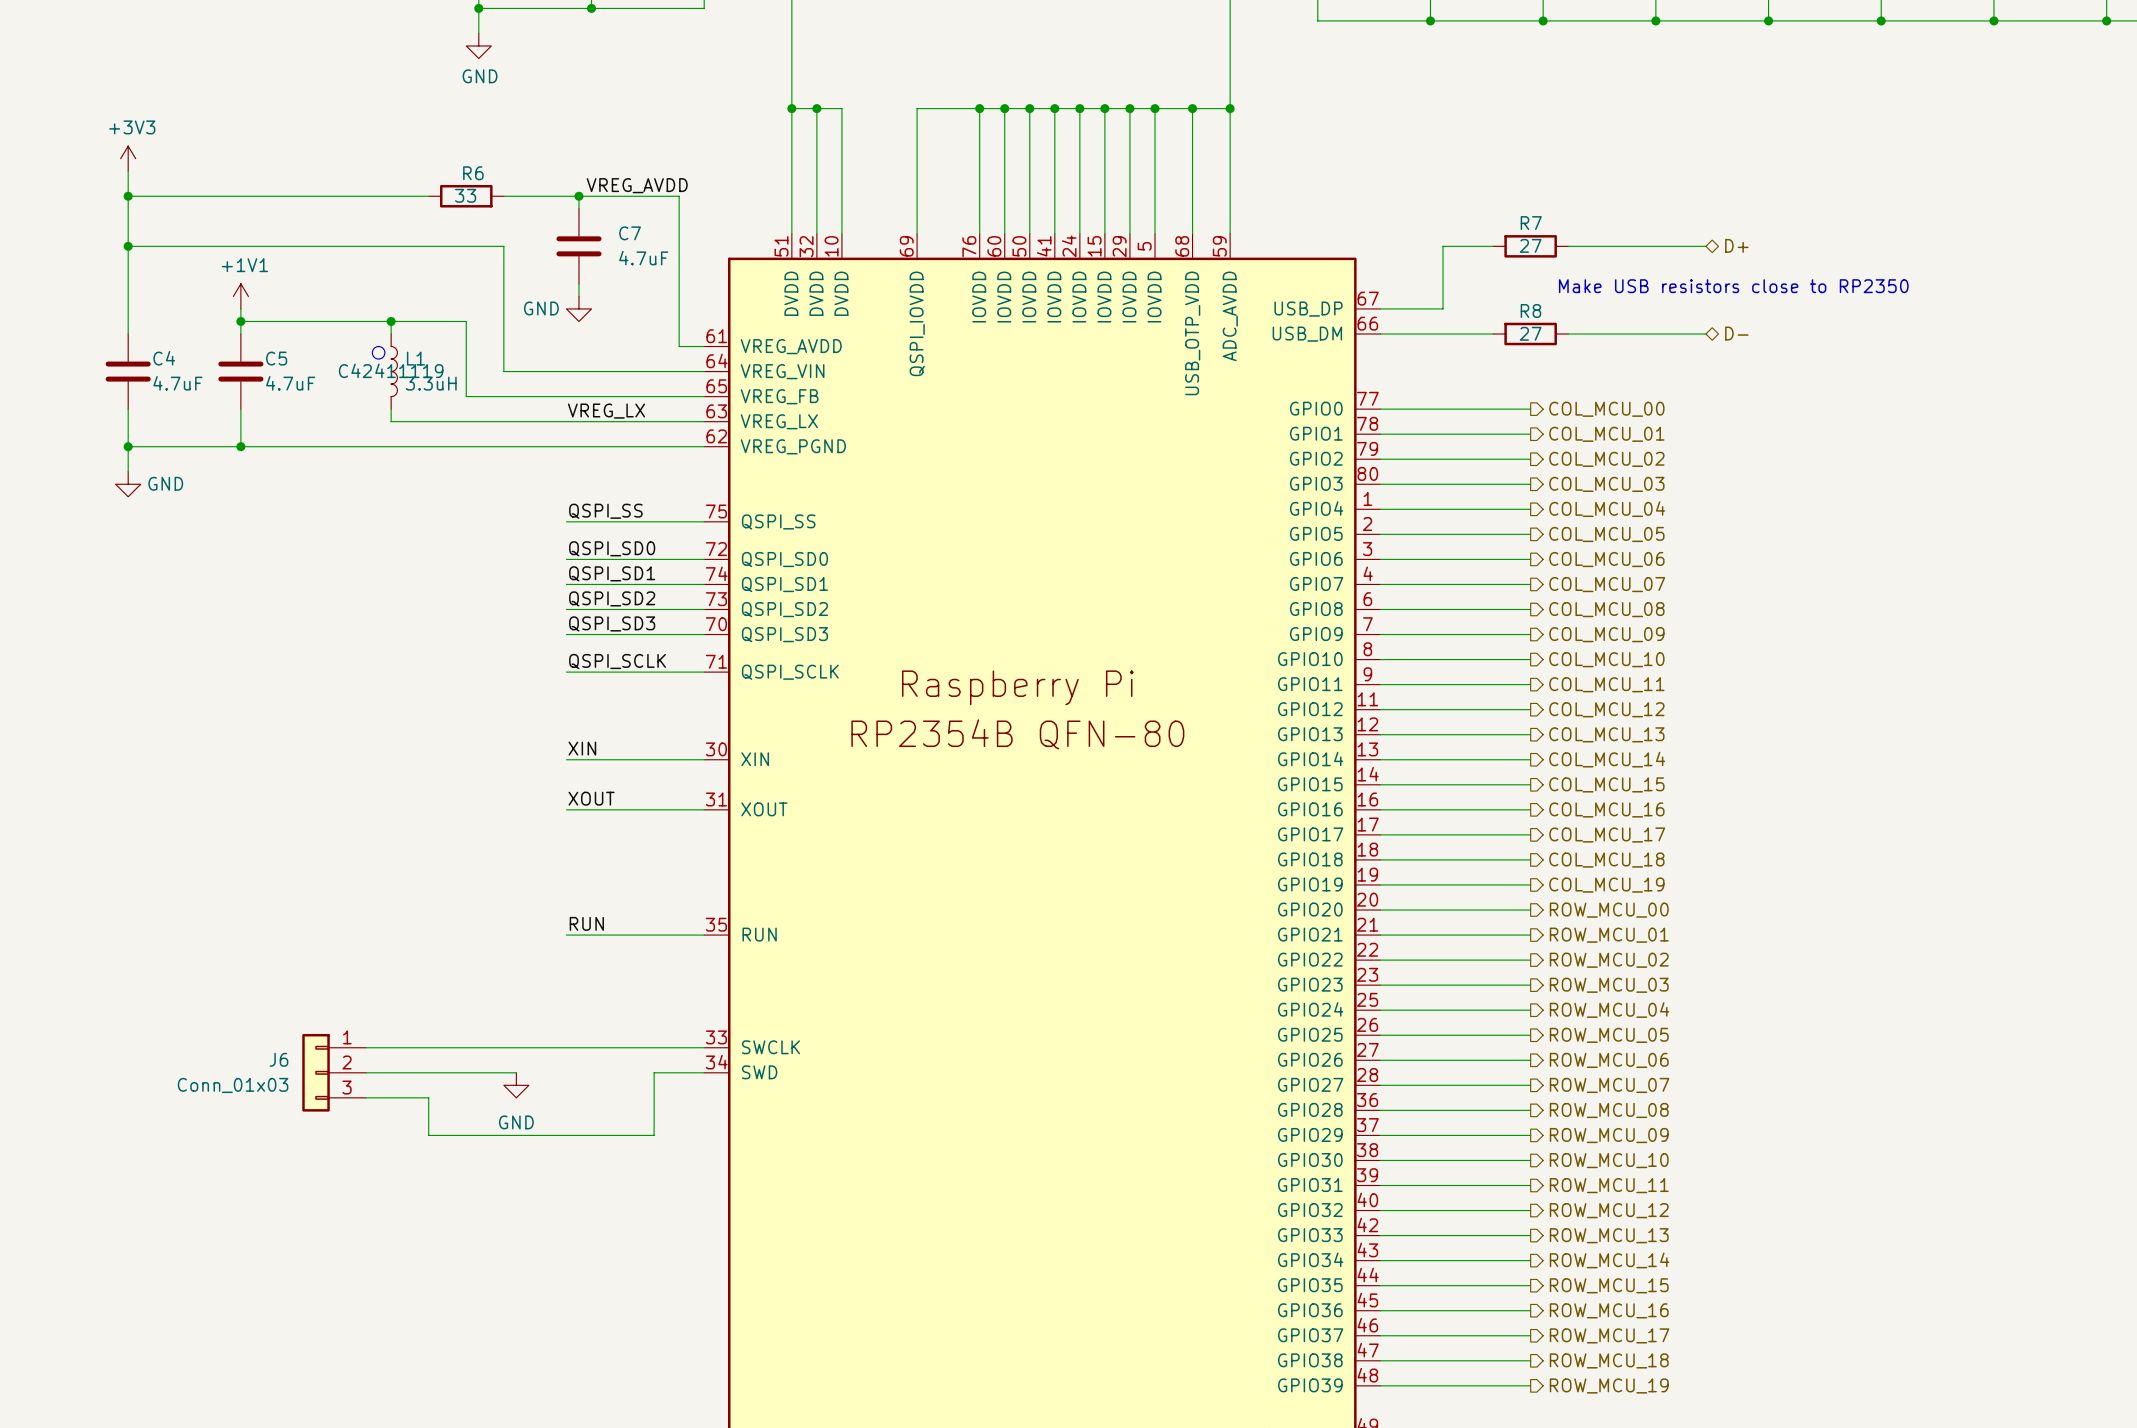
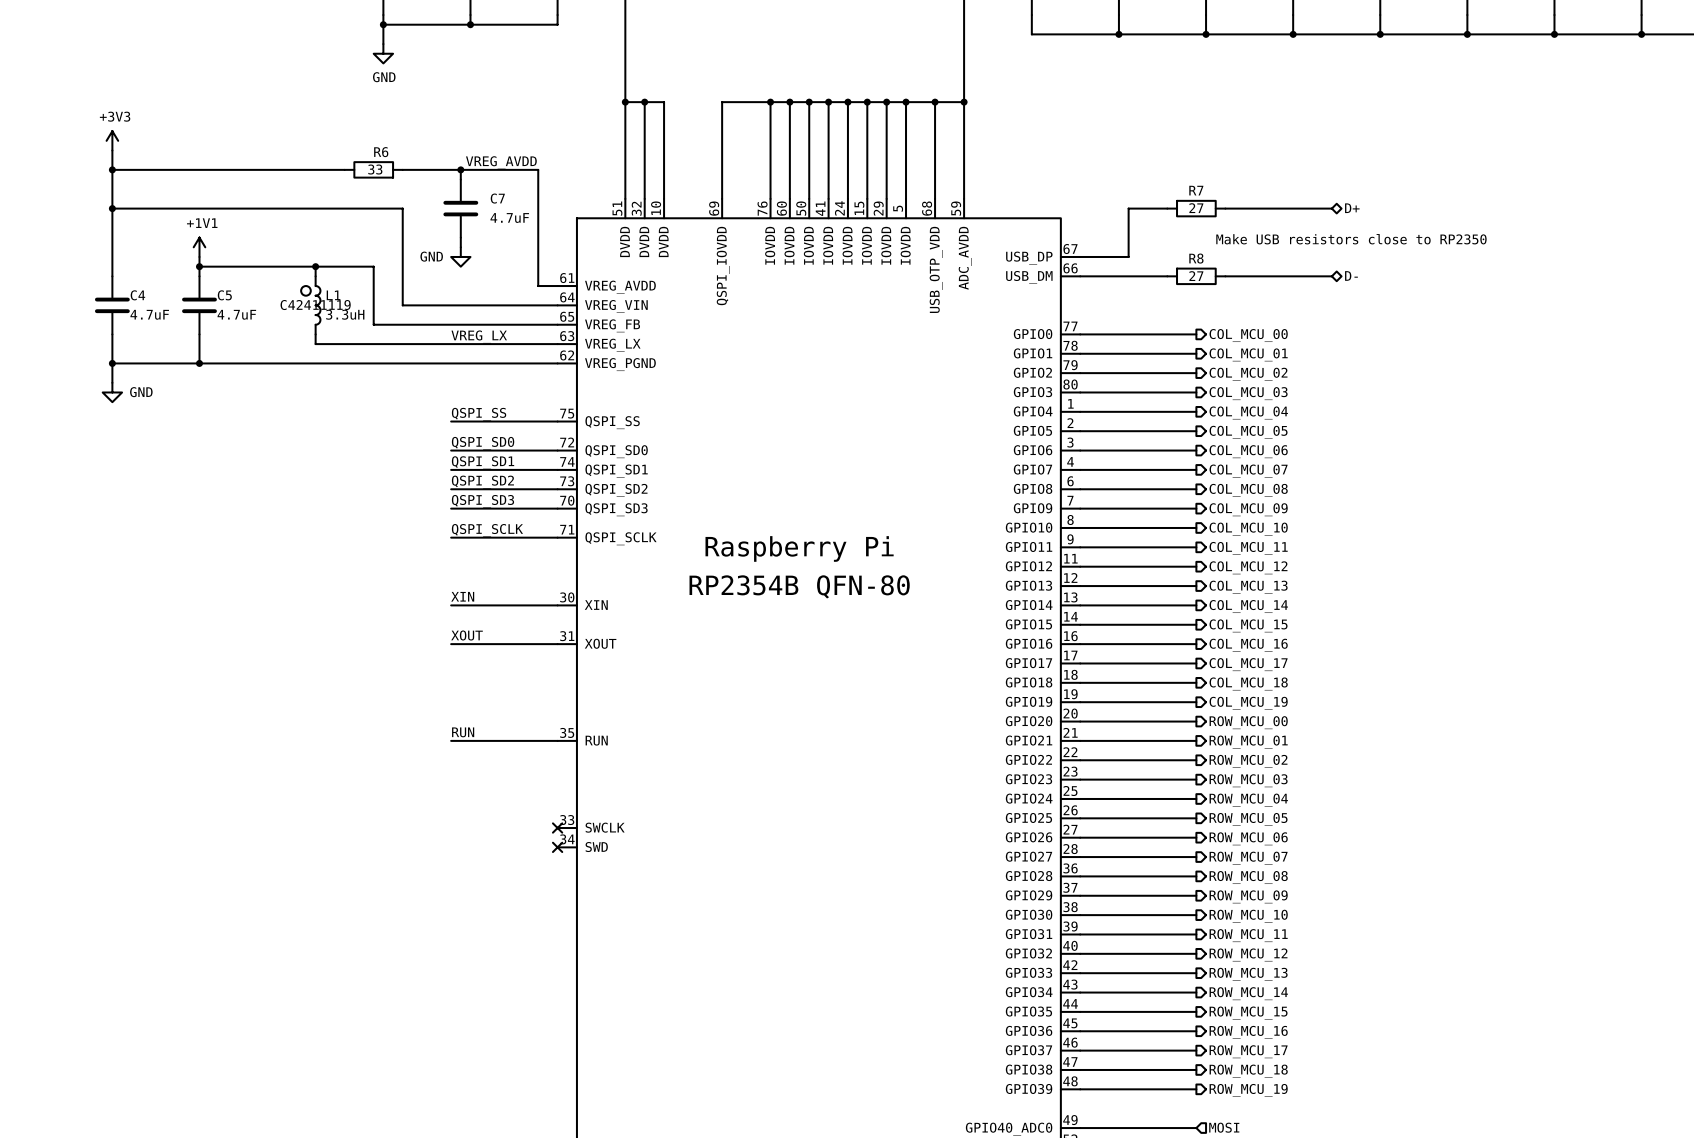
wire: (366, 1047) (704, 1047) -> none
no-connect mark: none -> (557, 828)
J6: Conn_01x03 (334, 1072) -> none
wire: (366, 1072) (516, 1072) -> none
wire: (704, 1072) (654, 1072) (654, 1135) (428, 1135) (428, 1097) (366, 1097) -> none
no-connect mark: none -> (557, 847)
power symbol: GND (516, 1085) -> none

